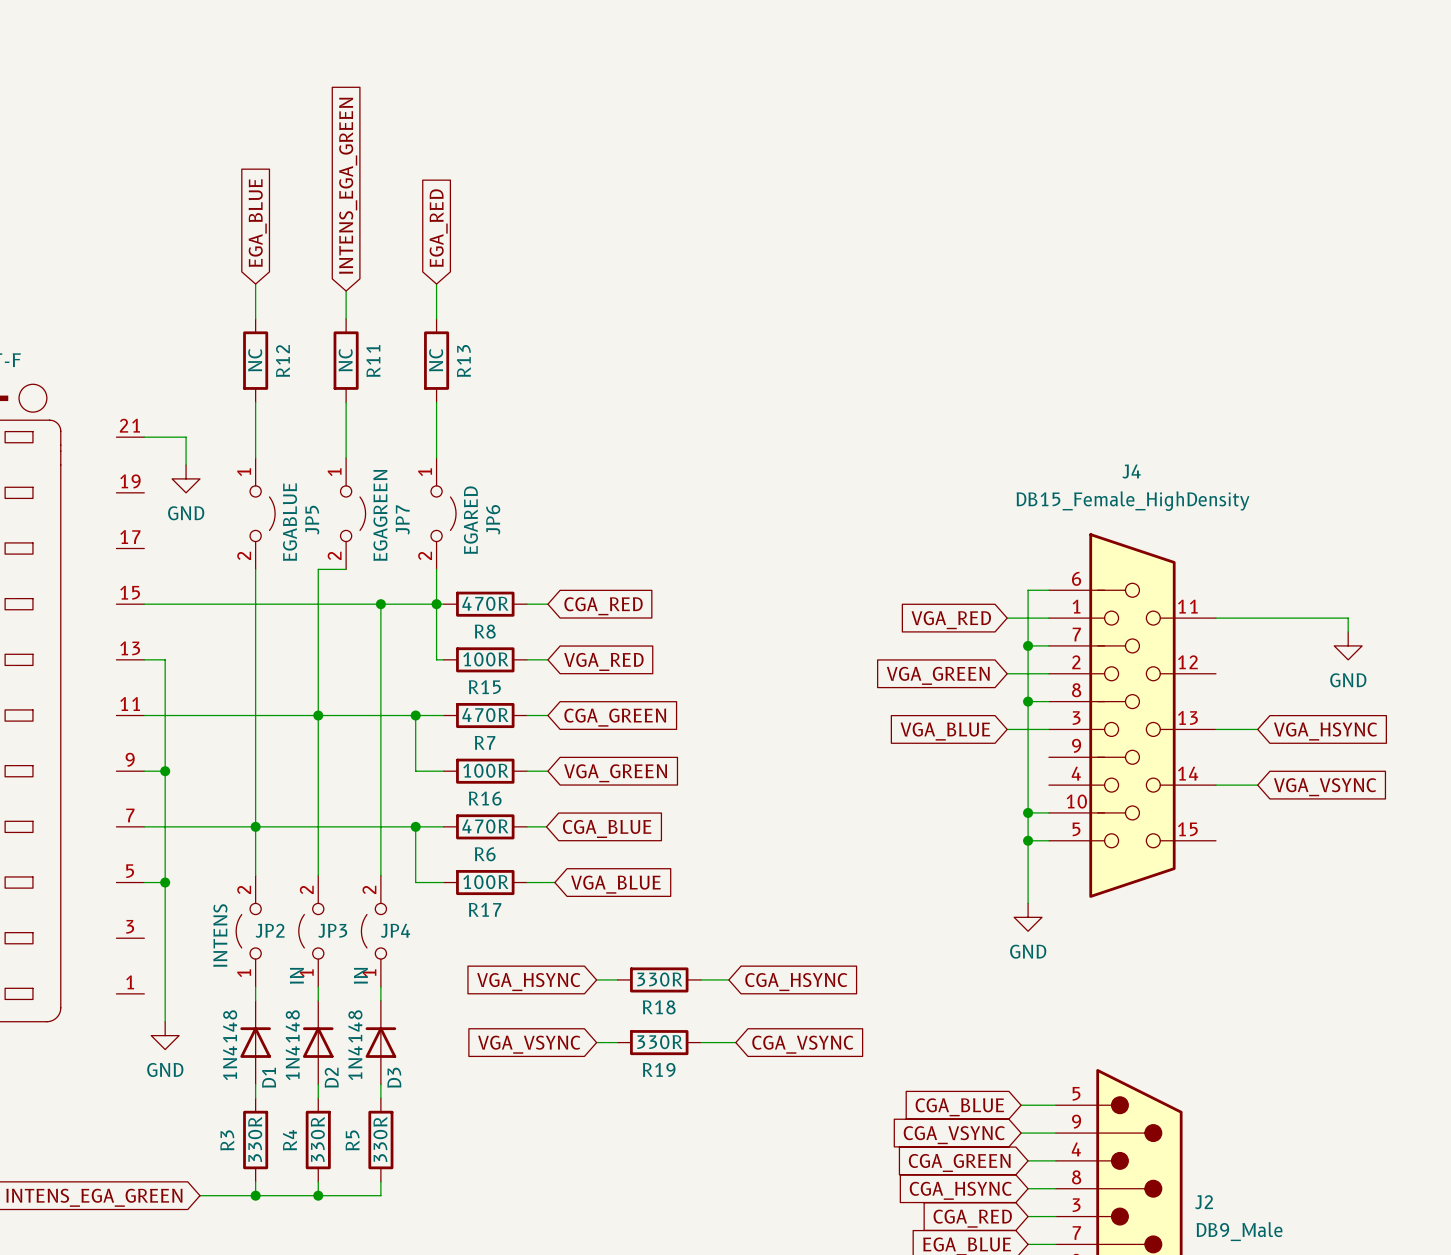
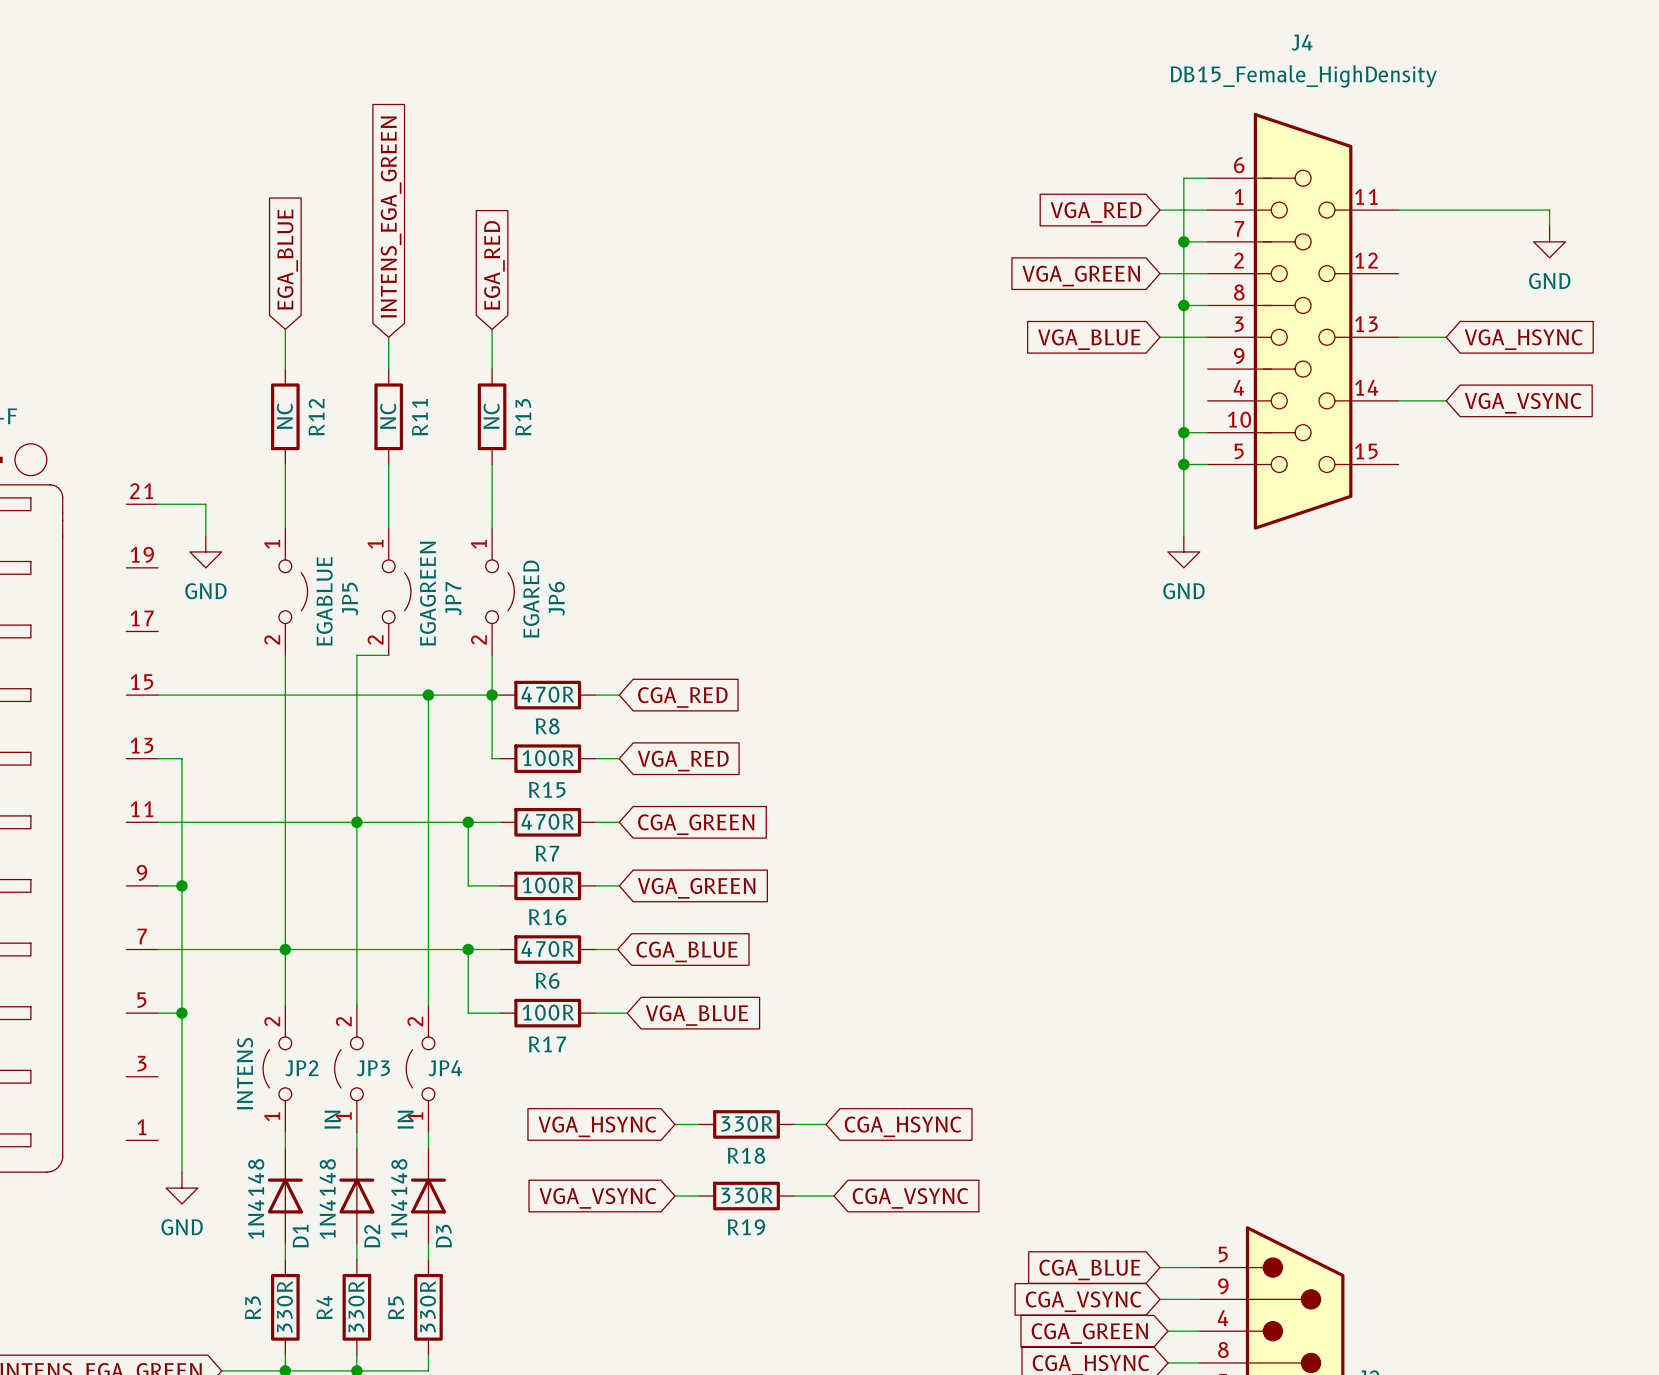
wire: none -> (1207, 178) (1183, 178) (1183, 536)
wire: none -> (1159, 210) (1207, 210)
wire: none -> (1398, 210) (1549, 210) (1549, 225)
global label: none -> VGA_RED (1096, 212)
wire: none -> (1183, 241) (1207, 241)
junction: none -> (1183, 241)
power symbol: none -> GND (1549, 241)
wire: none -> (1159, 273) (1207, 273)
global label: none -> VGA_GREEN (1081, 276)
wire: none -> (1183, 305) (1207, 305)
junction: none -> (1183, 305)
wire: none -> (1159, 337) (1207, 337)
wire: none -> (1398, 337) (1446, 337)
global label: none -> VGA_BLUE (1089, 339)
global label: none -> VGA_HSYNC (1523, 339)
wire: none -> (1398, 400) (1446, 400)
global label: none -> VGA_VSYNC (1523, 403)
wire: none -> (1183, 432) (1207, 432)
junction: none -> (1183, 432)
junction: none -> (1183, 464)
power symbol: none -> GND (1183, 551)
wire: (1048, 590) (1028, 590) (1028, 903) -> none
wire: (1007, 618) (1048, 618) -> none
wire: (1215, 618) (1348, 618) (1348, 632) -> none
global label: VGA_RED (951, 620) -> none
wire: (1028, 645) (1048, 645) -> (1183, 464) (1207, 464)
junction: (1028, 645) -> none
power symbol: GND (1348, 645) -> none
wire: (1007, 673) (1048, 673) -> none
global label: VGA_GREEN (938, 675) -> none
wire: (1028, 701) (1048, 701) -> none
junction: (1028, 701) -> none
J4 position: (1132, 715) -> (1303, 321)
wire: (1007, 729) (1048, 729) -> none
wire: (1215, 729) (1257, 729) -> none
global label: VGA_BLUE (945, 731) -> none
global label: VGA_HSYNC (1325, 731) -> none
wire: (1215, 785) (1257, 785) -> none
global label: VGA_VSYNC (1325, 787) -> none
wire: (1028, 812) (1048, 812) -> none
junction: (1028, 812) -> none
wire: (1028, 840) (1048, 840) -> none
junction: (1028, 840) -> none
power symbol: GND (1028, 917) -> none

